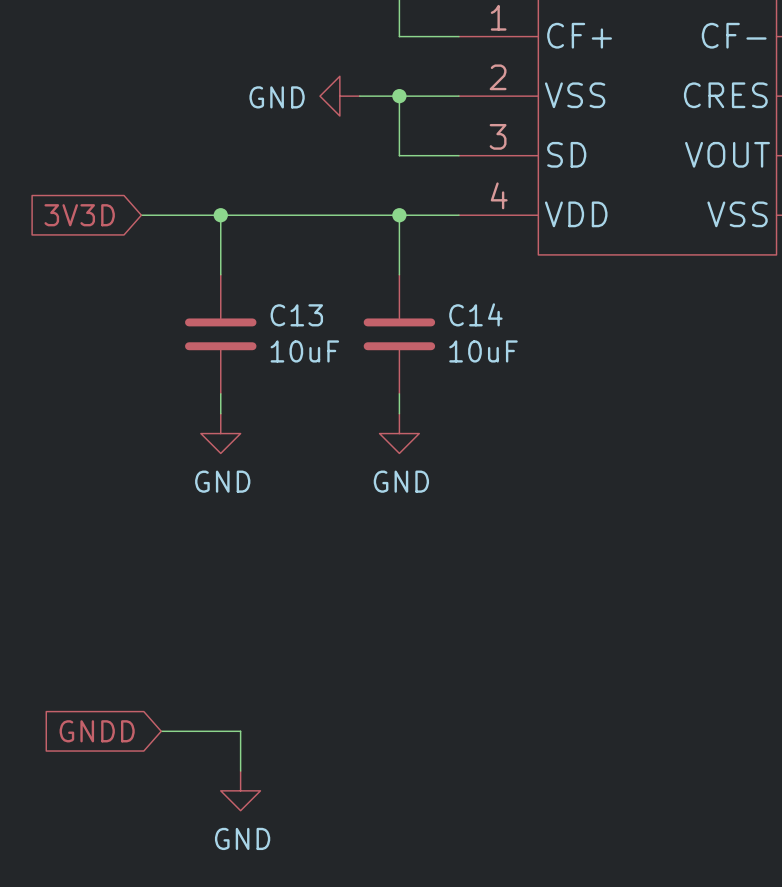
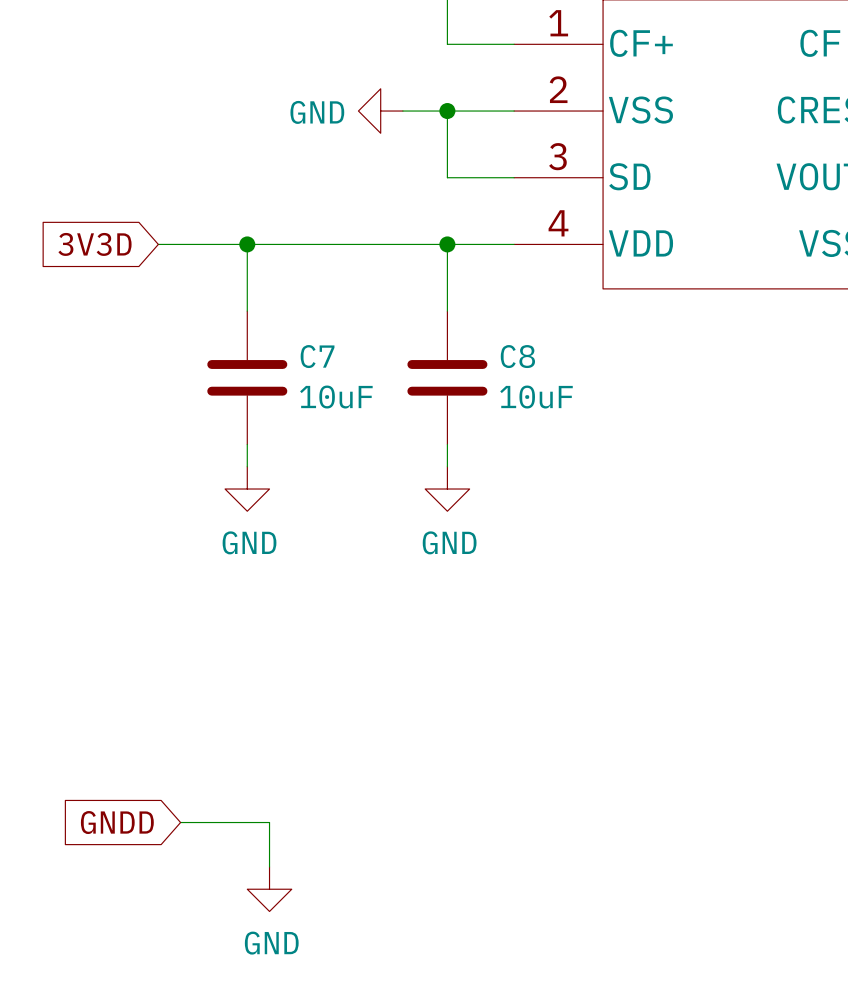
C14 name: C14 (475, 314) -> C8 (517, 356)
C13 name: C13 (296, 315) -> C7 (317, 356)

